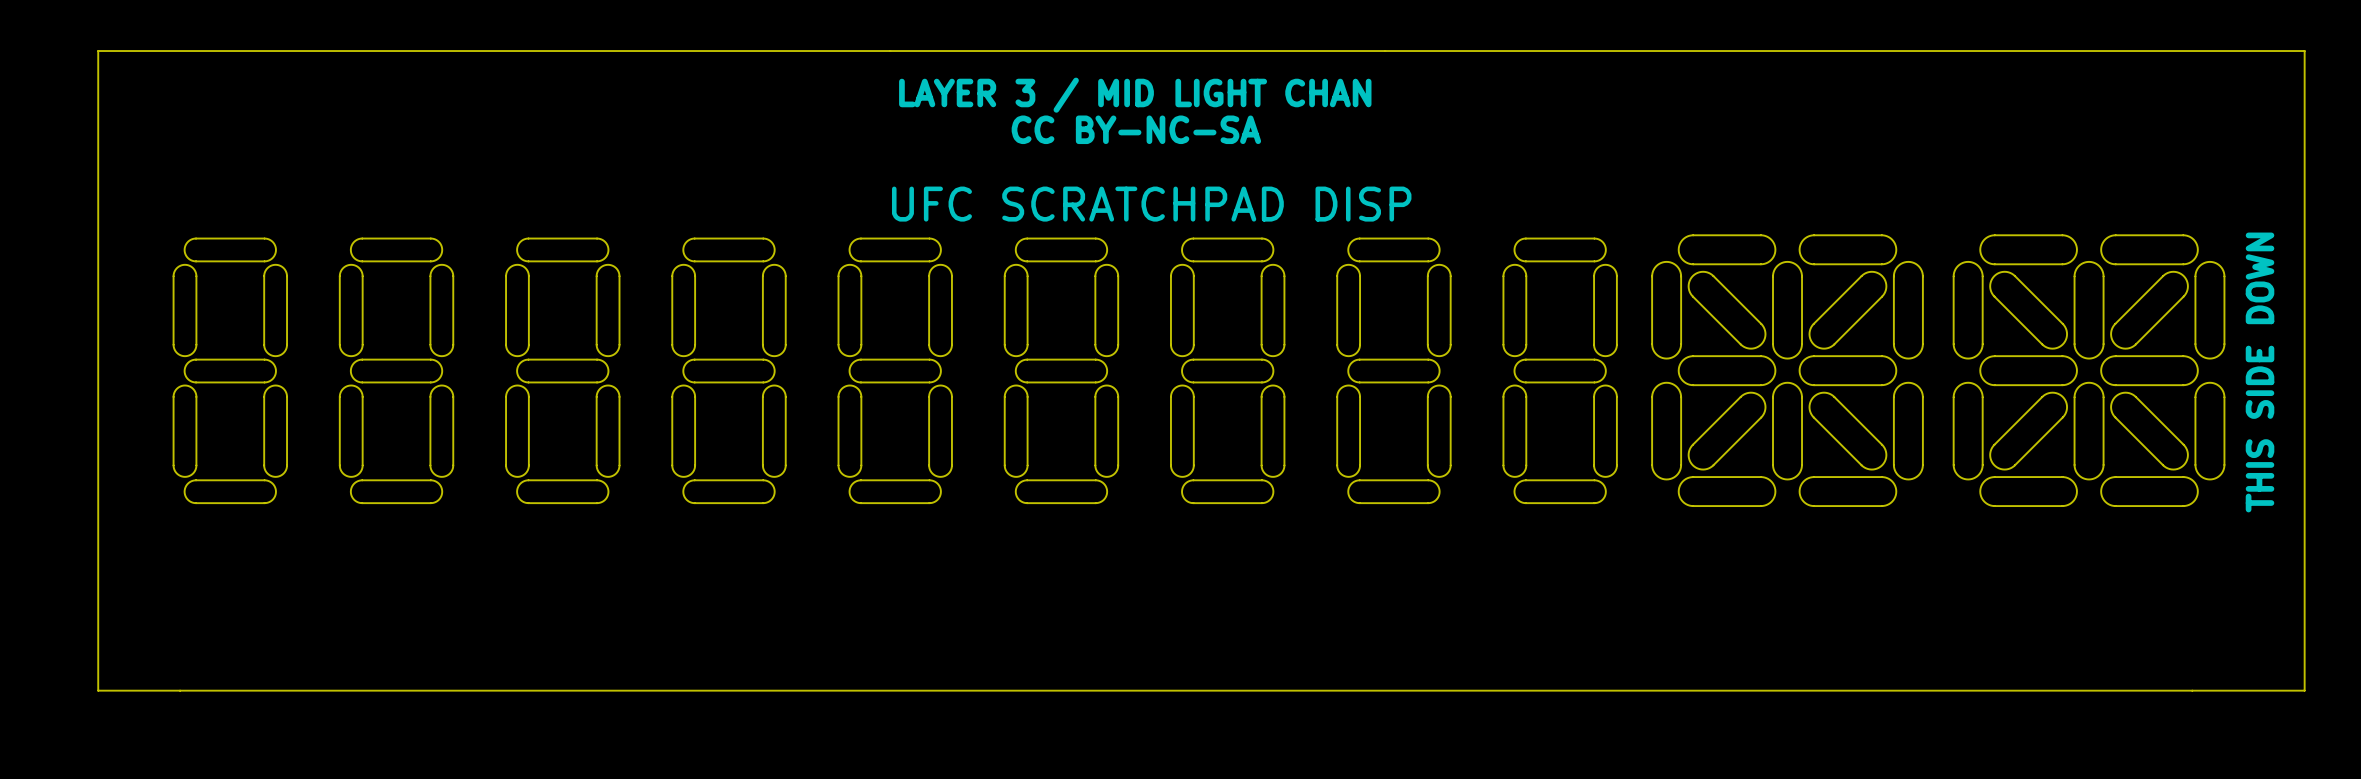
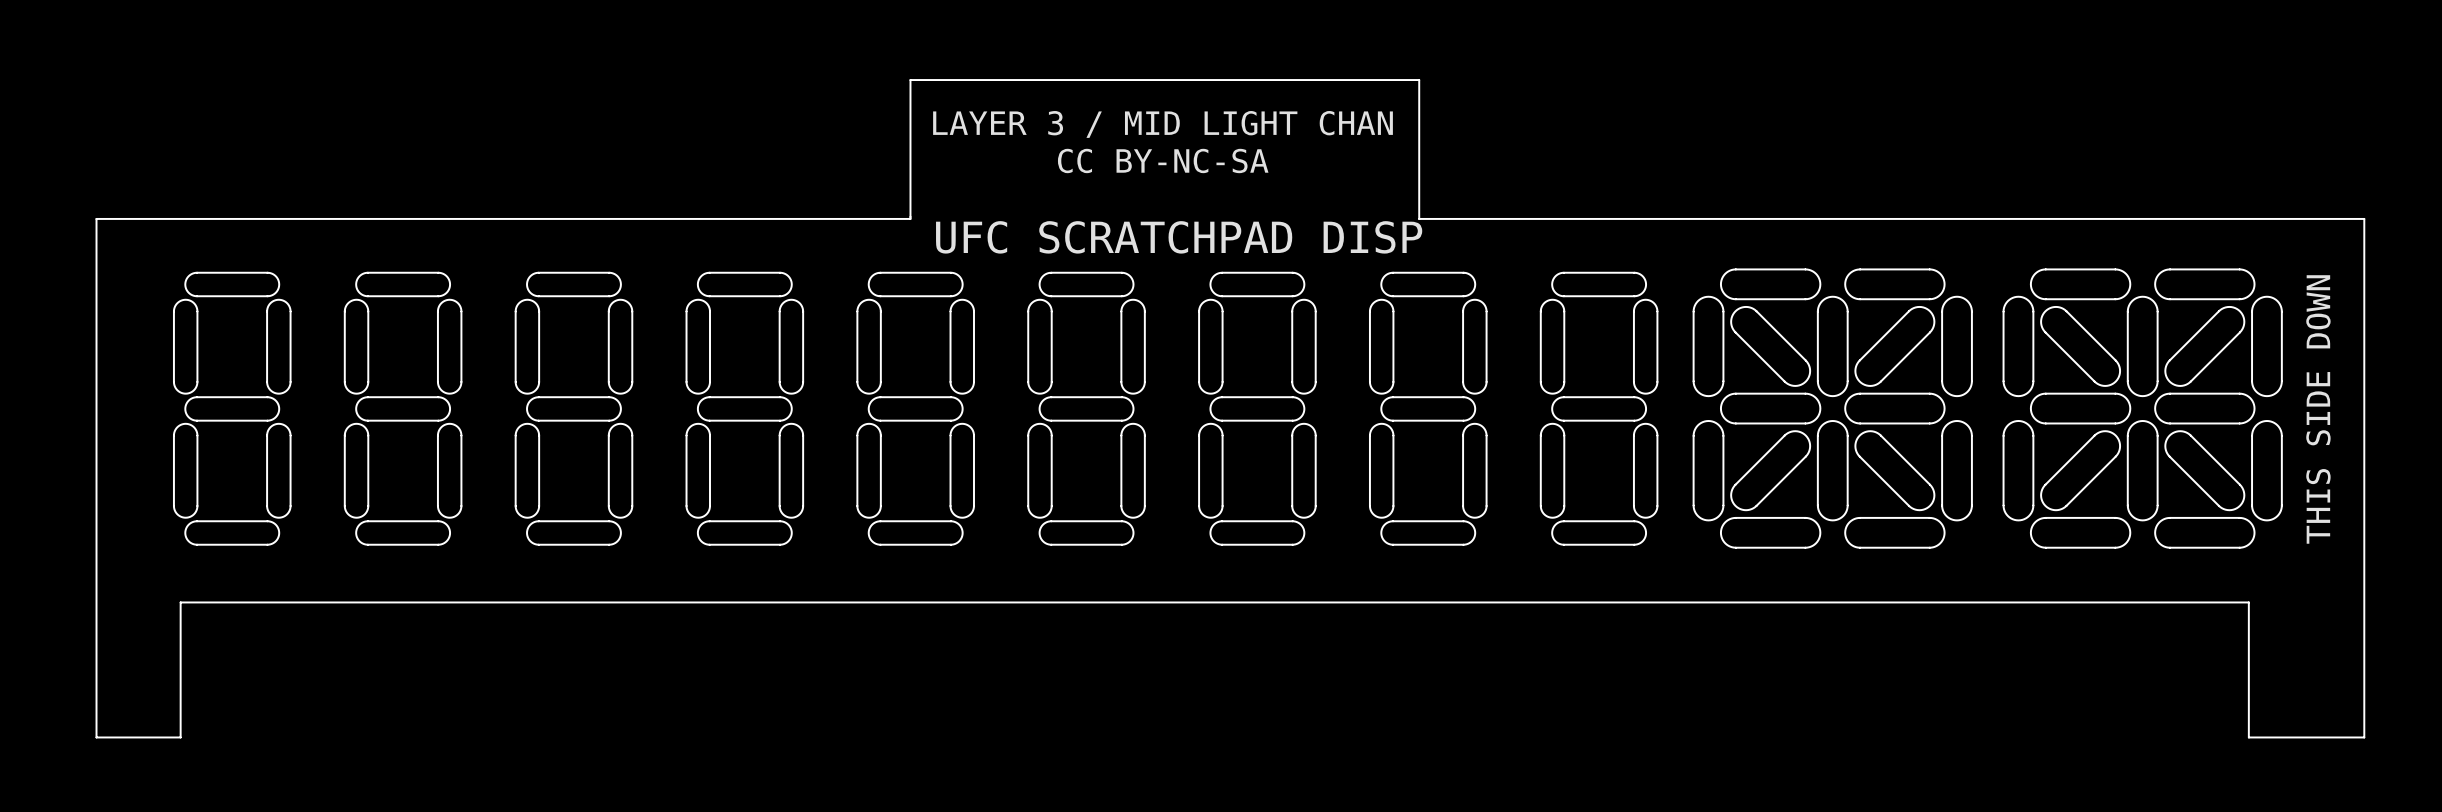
board edge: (890, 51) (98, 51) (98, 186) -> (910, 80) (910, 218) (96, 218)
board edge: (1385, 51) (2304, 51) (2304, 186) -> (1419, 80) (1419, 218) (2364, 218)
board edge: (2192, 690) (180, 690) -> (2248, 737) (2248, 602) (180, 602) (180, 737)

